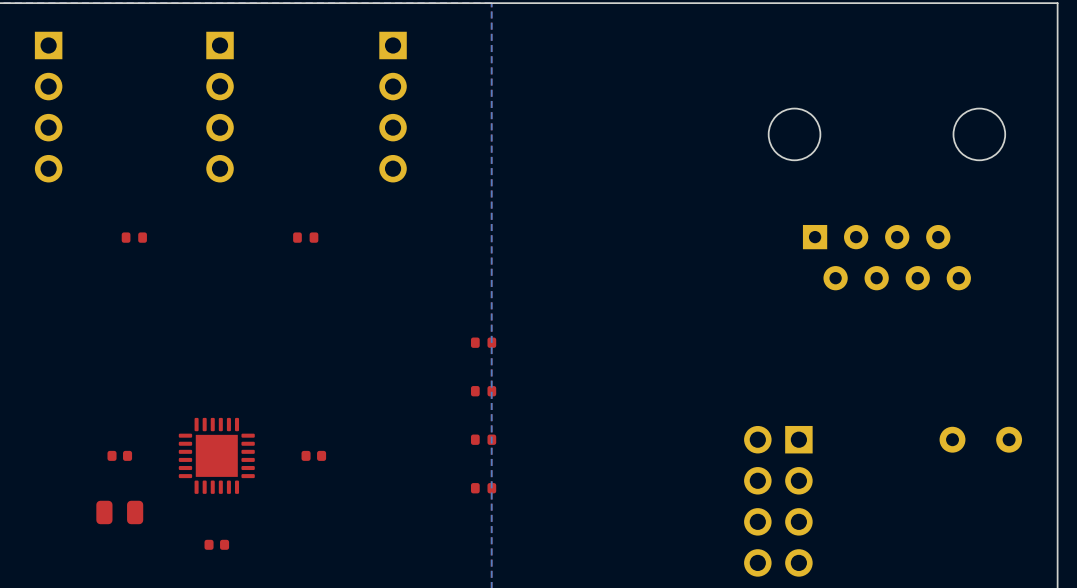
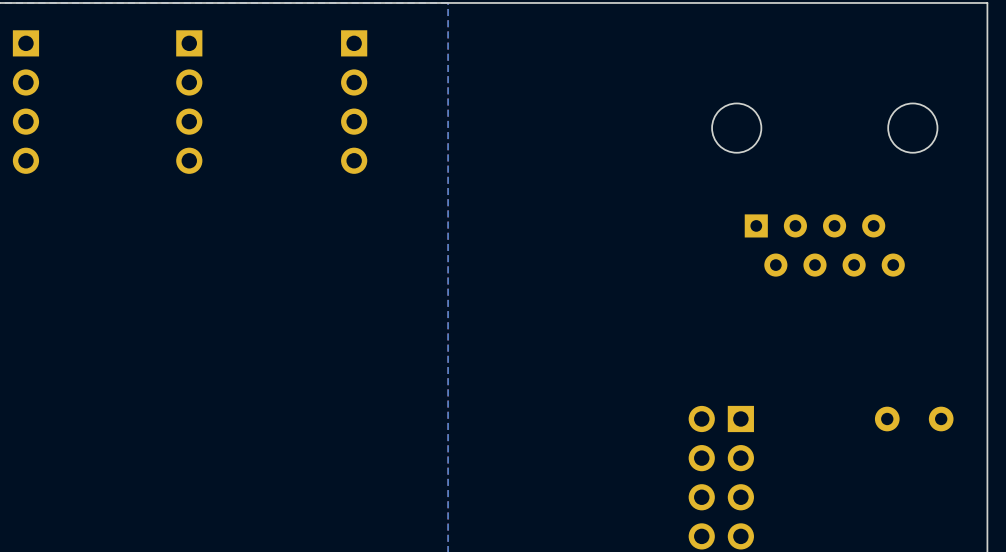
part: (134, 237) -> none
part: (305, 237) -> none
part: (483, 342) -> none
part: (483, 391) -> none
part: (483, 439) -> none
part: (119, 455) -> none
part: (216, 455) -> none
part: (313, 455) -> none
part: (483, 488) -> none
part: (119, 512) -> none
part: (216, 544) -> none

